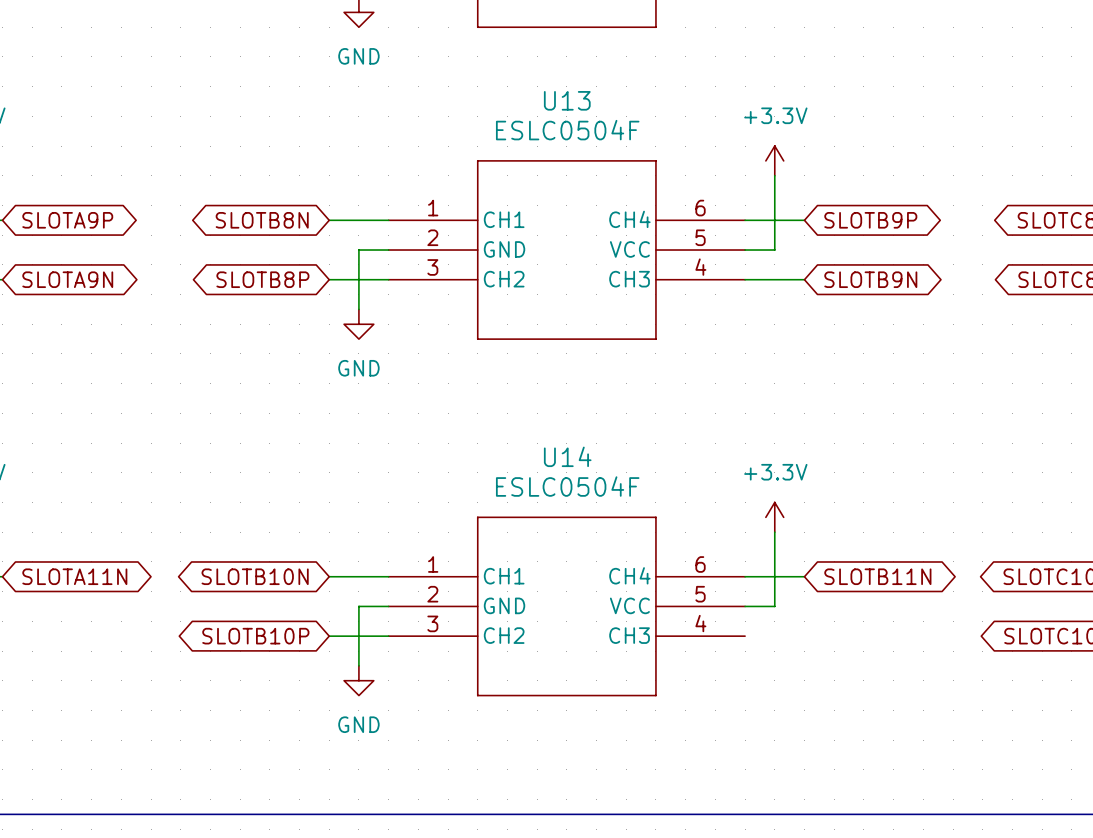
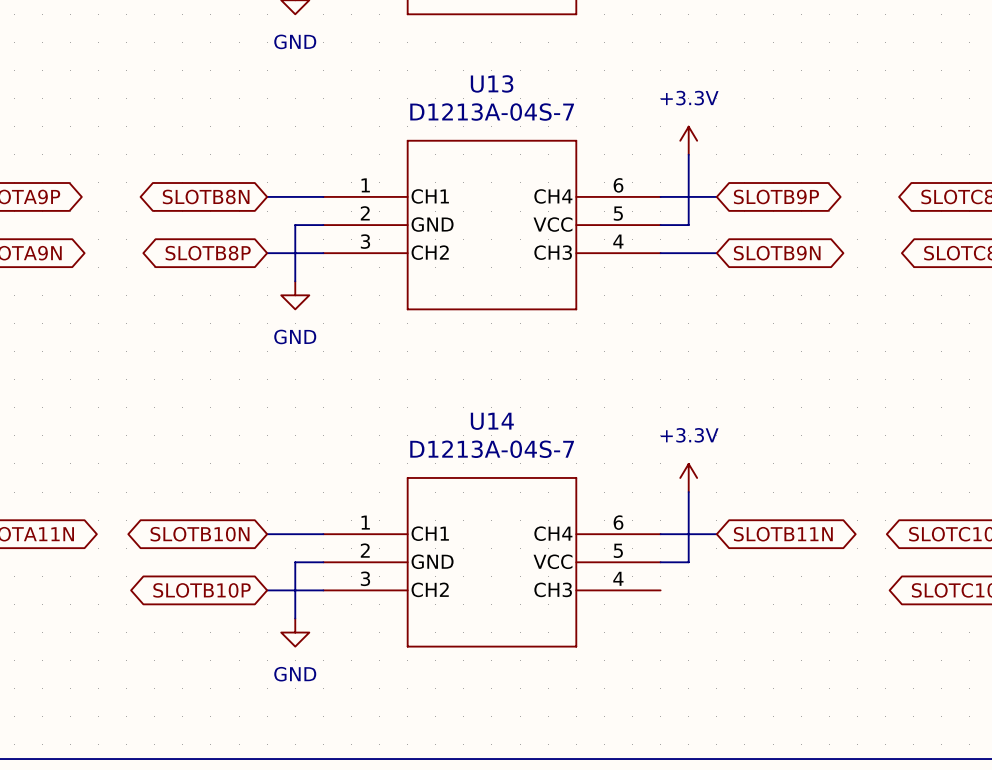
U13 value: ESLC0504F (567, 130) -> D1213A-04S-7 (492, 112)
U14 value: ESLC0504F (567, 486) -> D1213A-04S-7 (492, 449)

